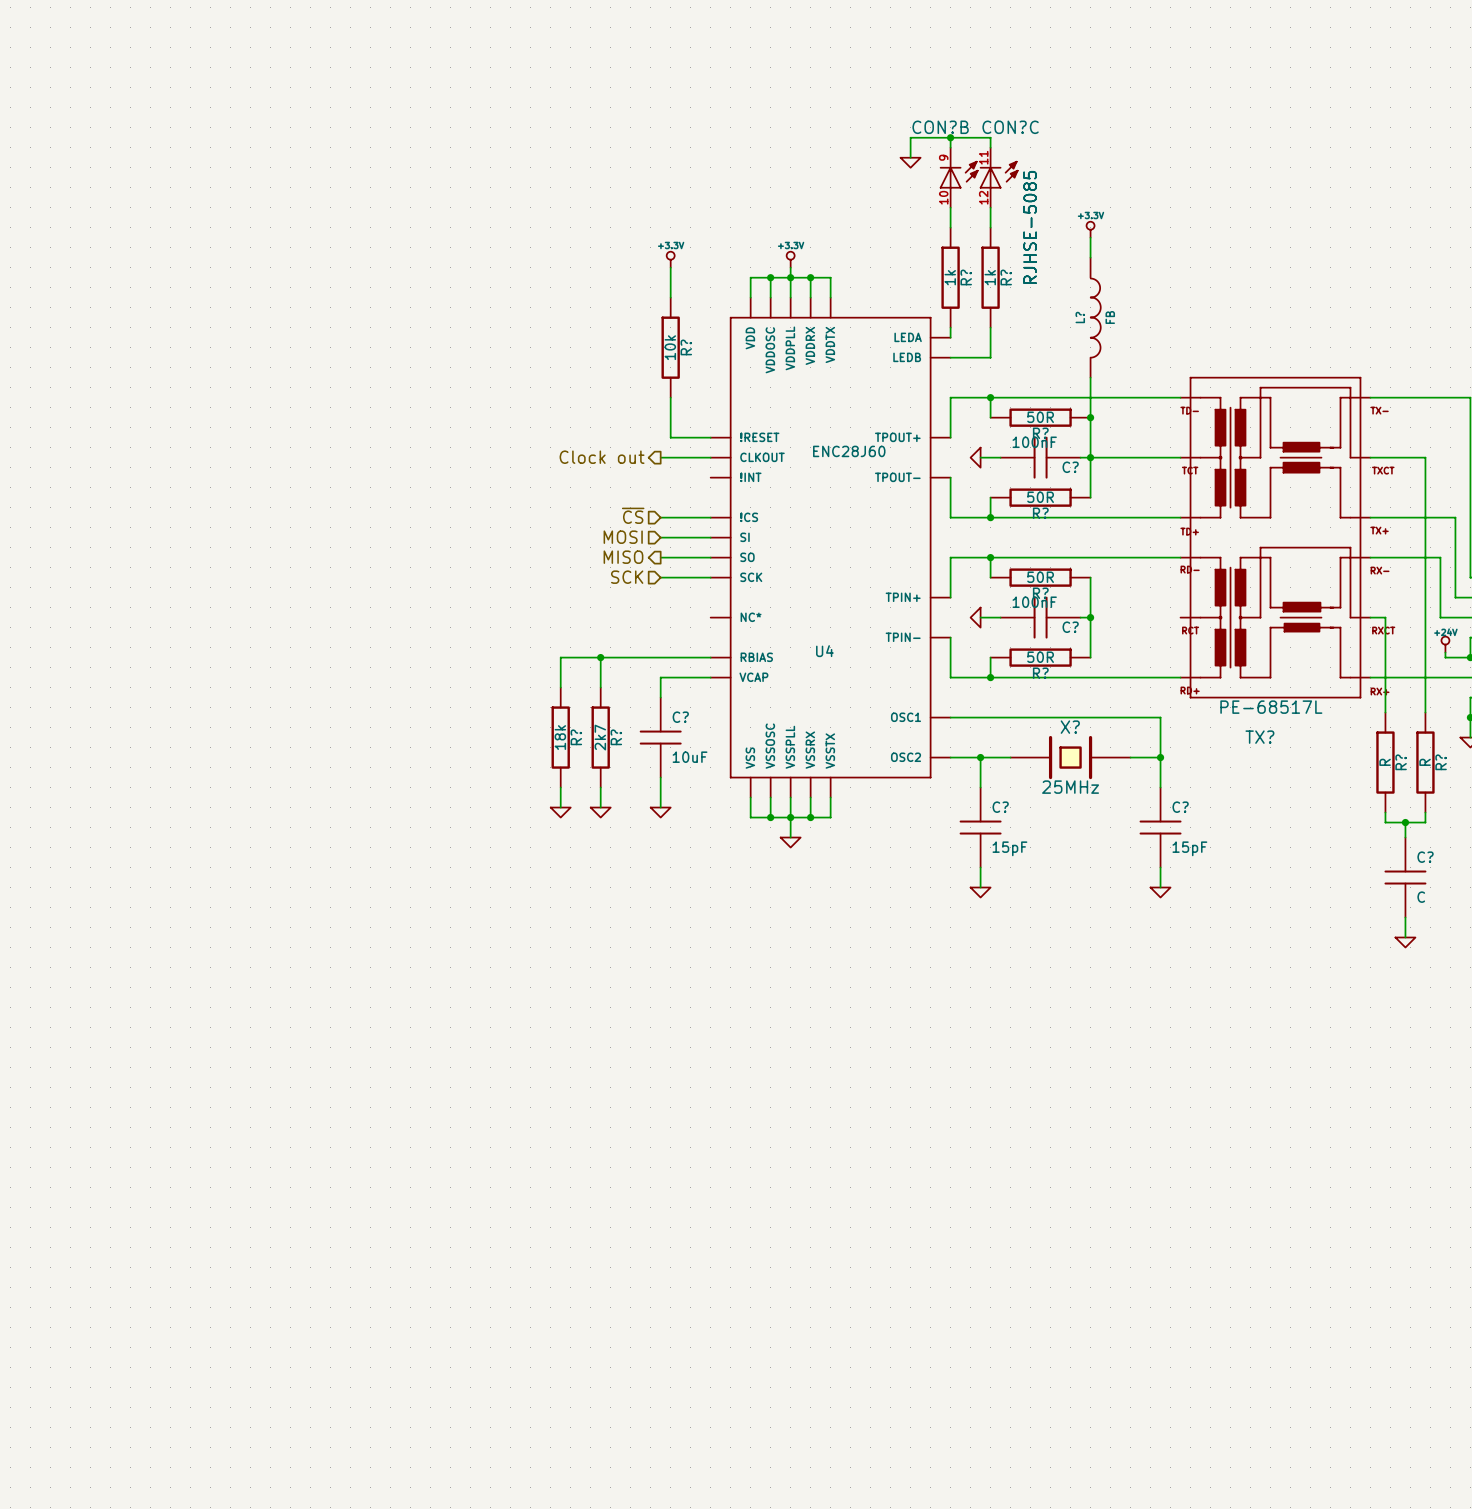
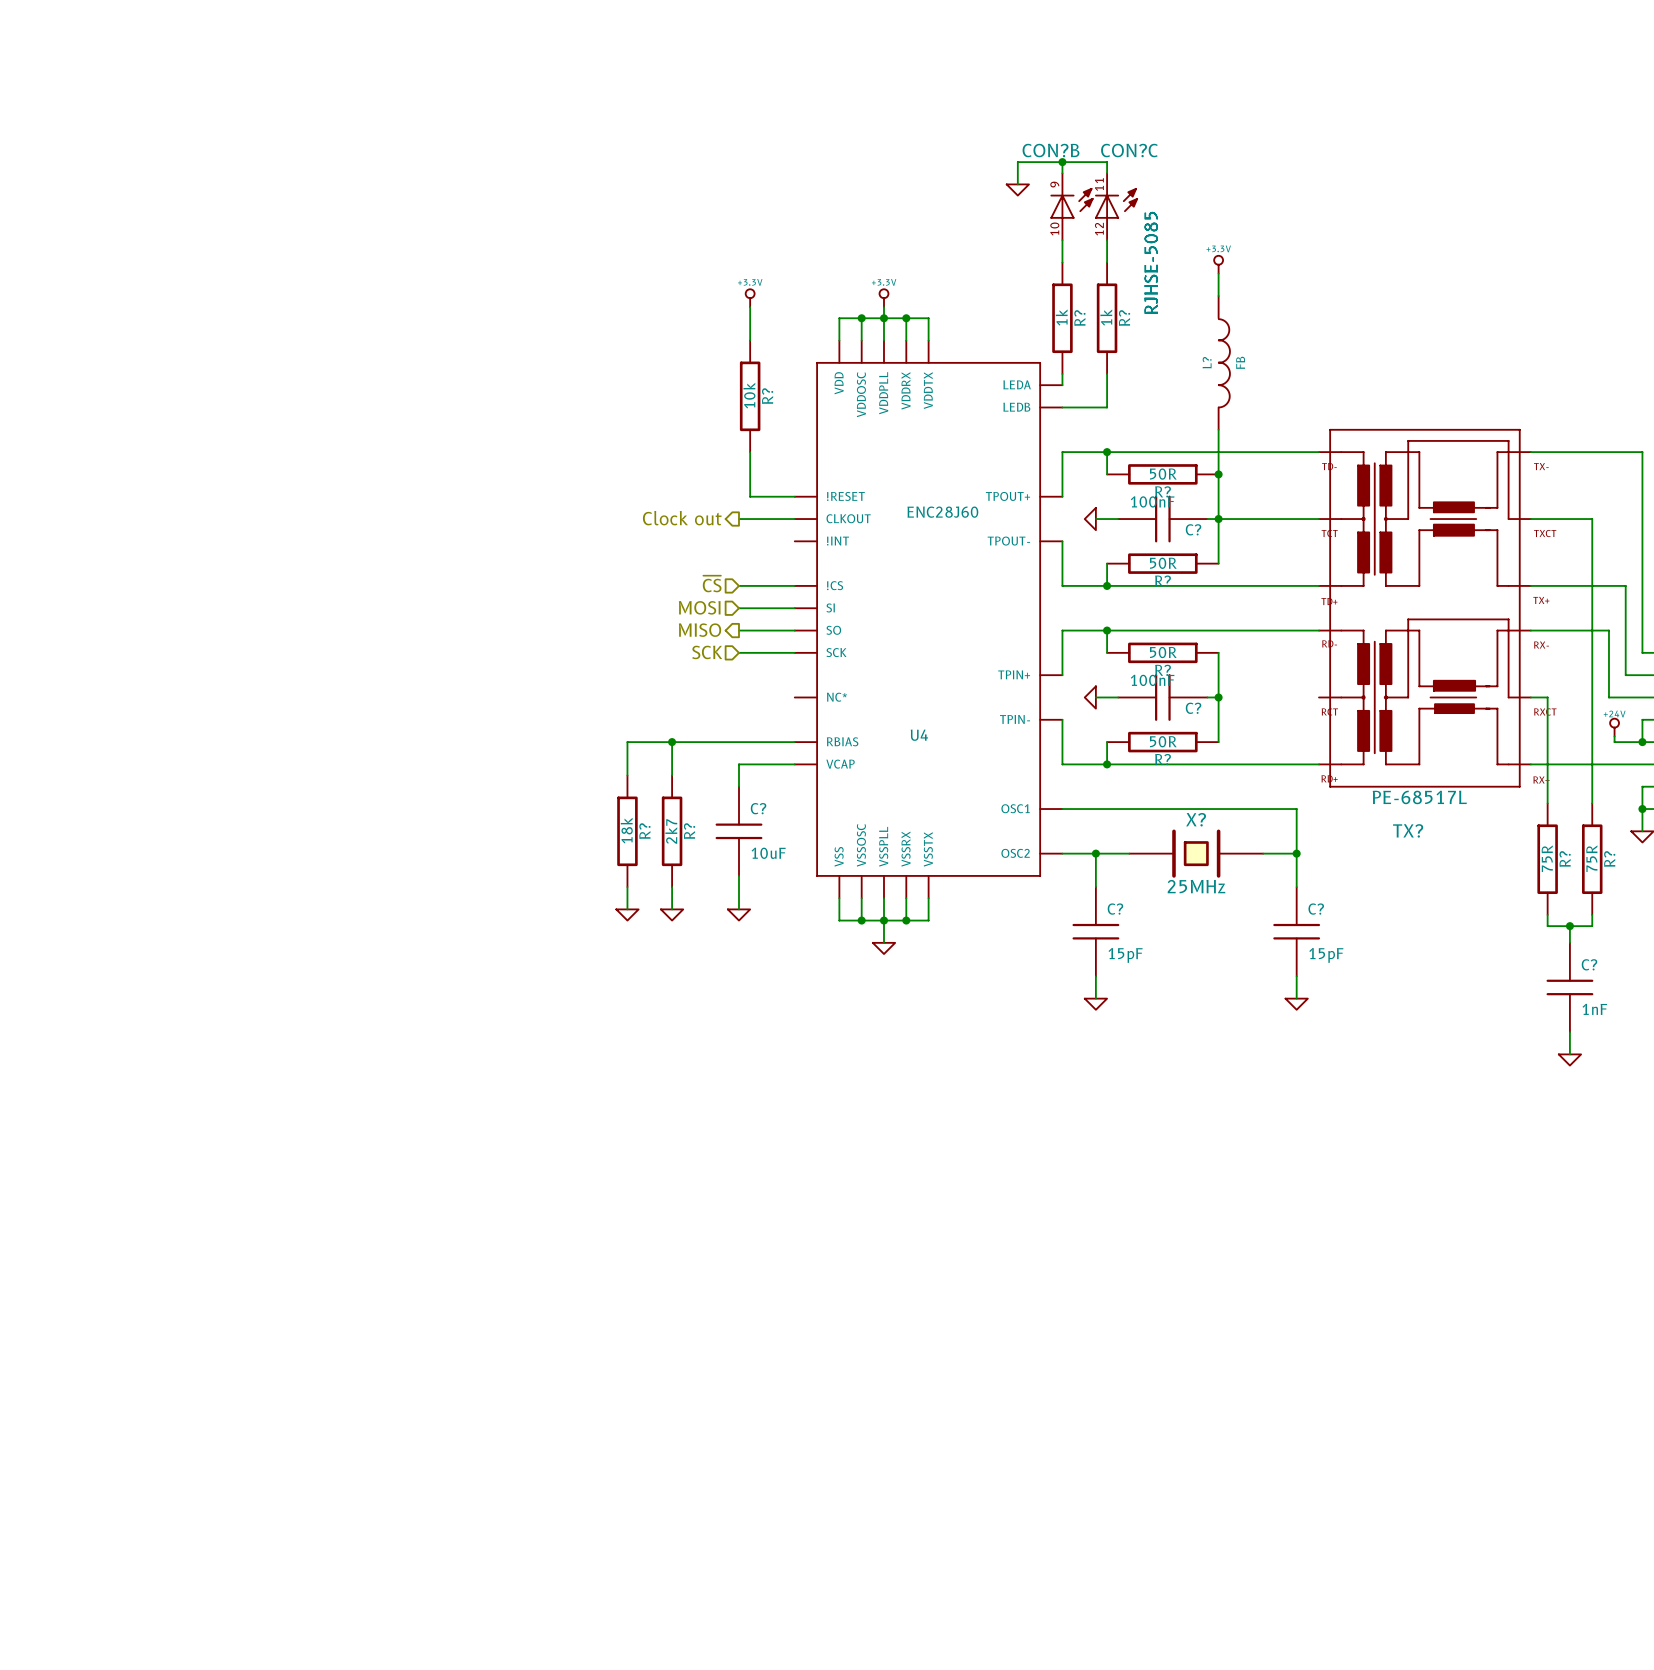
R? value: R (1385, 762) -> 75R (1547, 858)
R? value: R (1425, 762) -> 75R (1591, 858)
C? value: C (1421, 897) -> 1nF (1594, 1009)

